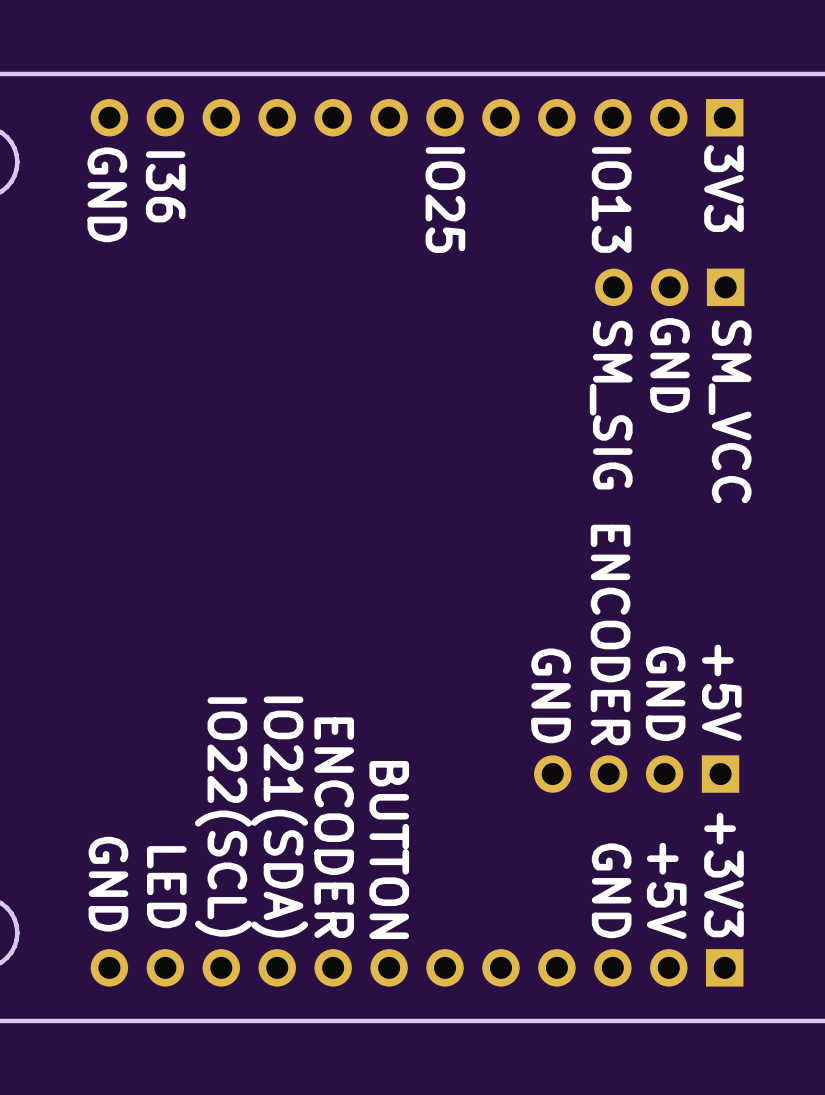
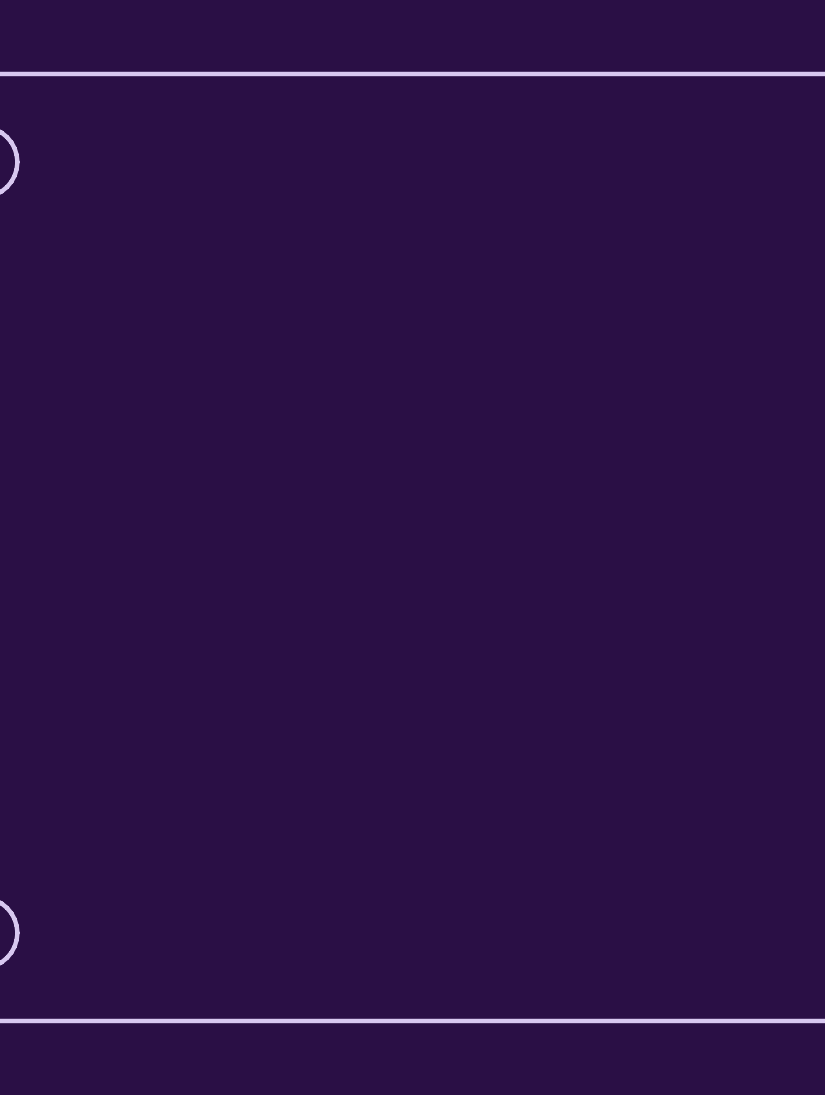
part: (417, 117) -> none
text: I36 (165, 186) -> none
text: 3V3 (723, 188) -> none
text: GND (107, 194) -> none
text: IO25 (445, 200) -> none
text: IO13 (611, 200) -> none
part: (669, 287) -> none
text: GND (670, 365) -> none
text: SM_SIG (611, 405) -> none
text: SM_VCC (730, 411) -> none
text: ENCODER (610, 634) -> none
text: +5V (721, 692) -> none
text: GND (665, 693) -> none
text: GND (551, 695) -> none
part: (636, 774) -> none
text: IO22(SCL) (223, 816) -> none
text: IO21(SDA) (279, 816) -> none
text: ENCODER (334, 827) -> none
text: BUTTON (389, 850) -> none
text: +3V3 (723, 875) -> none
text: GND (108, 884) -> none
text: LED (166, 887) -> none
text: GND (611, 890) -> none
text: +5V (666, 890) -> none
part: (417, 967) -> none

